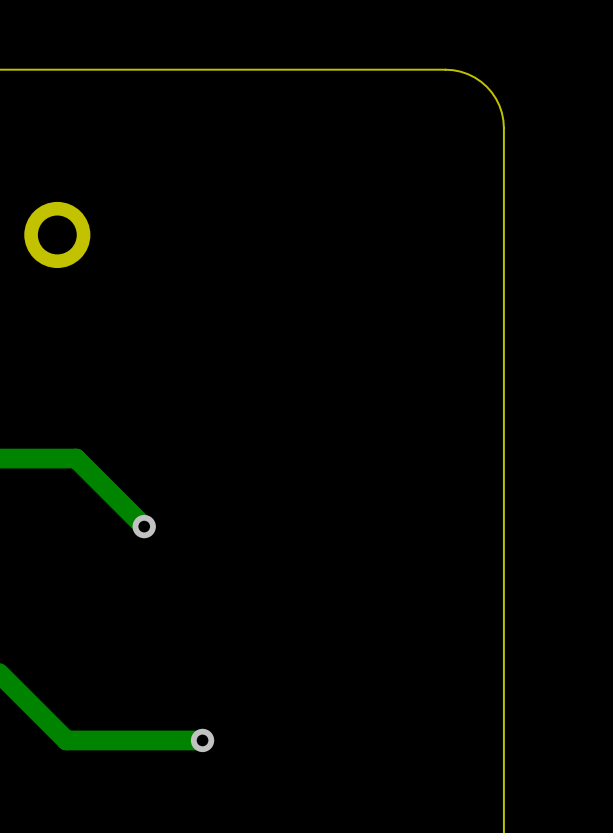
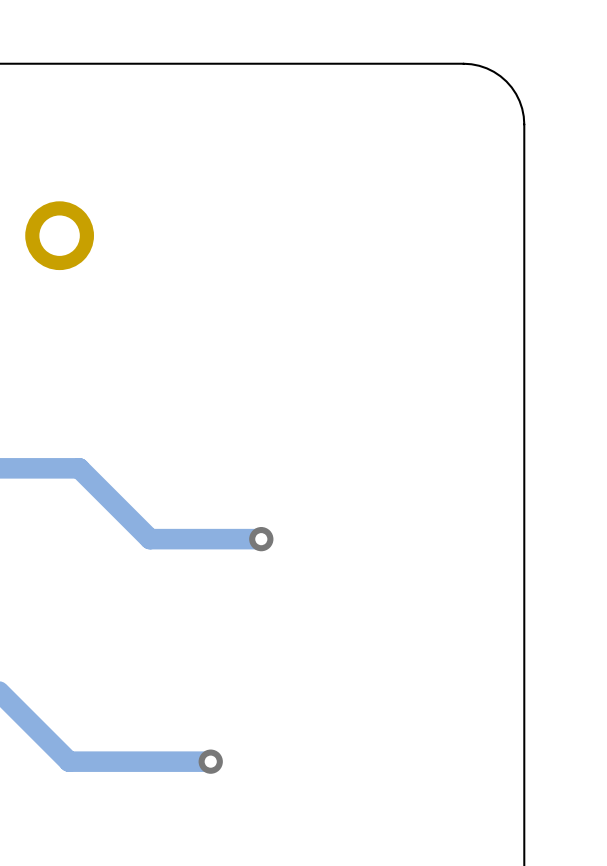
via: (144, 526) -> none
track: none -> (261, 539) (150, 539)
via: none -> (261, 539)

